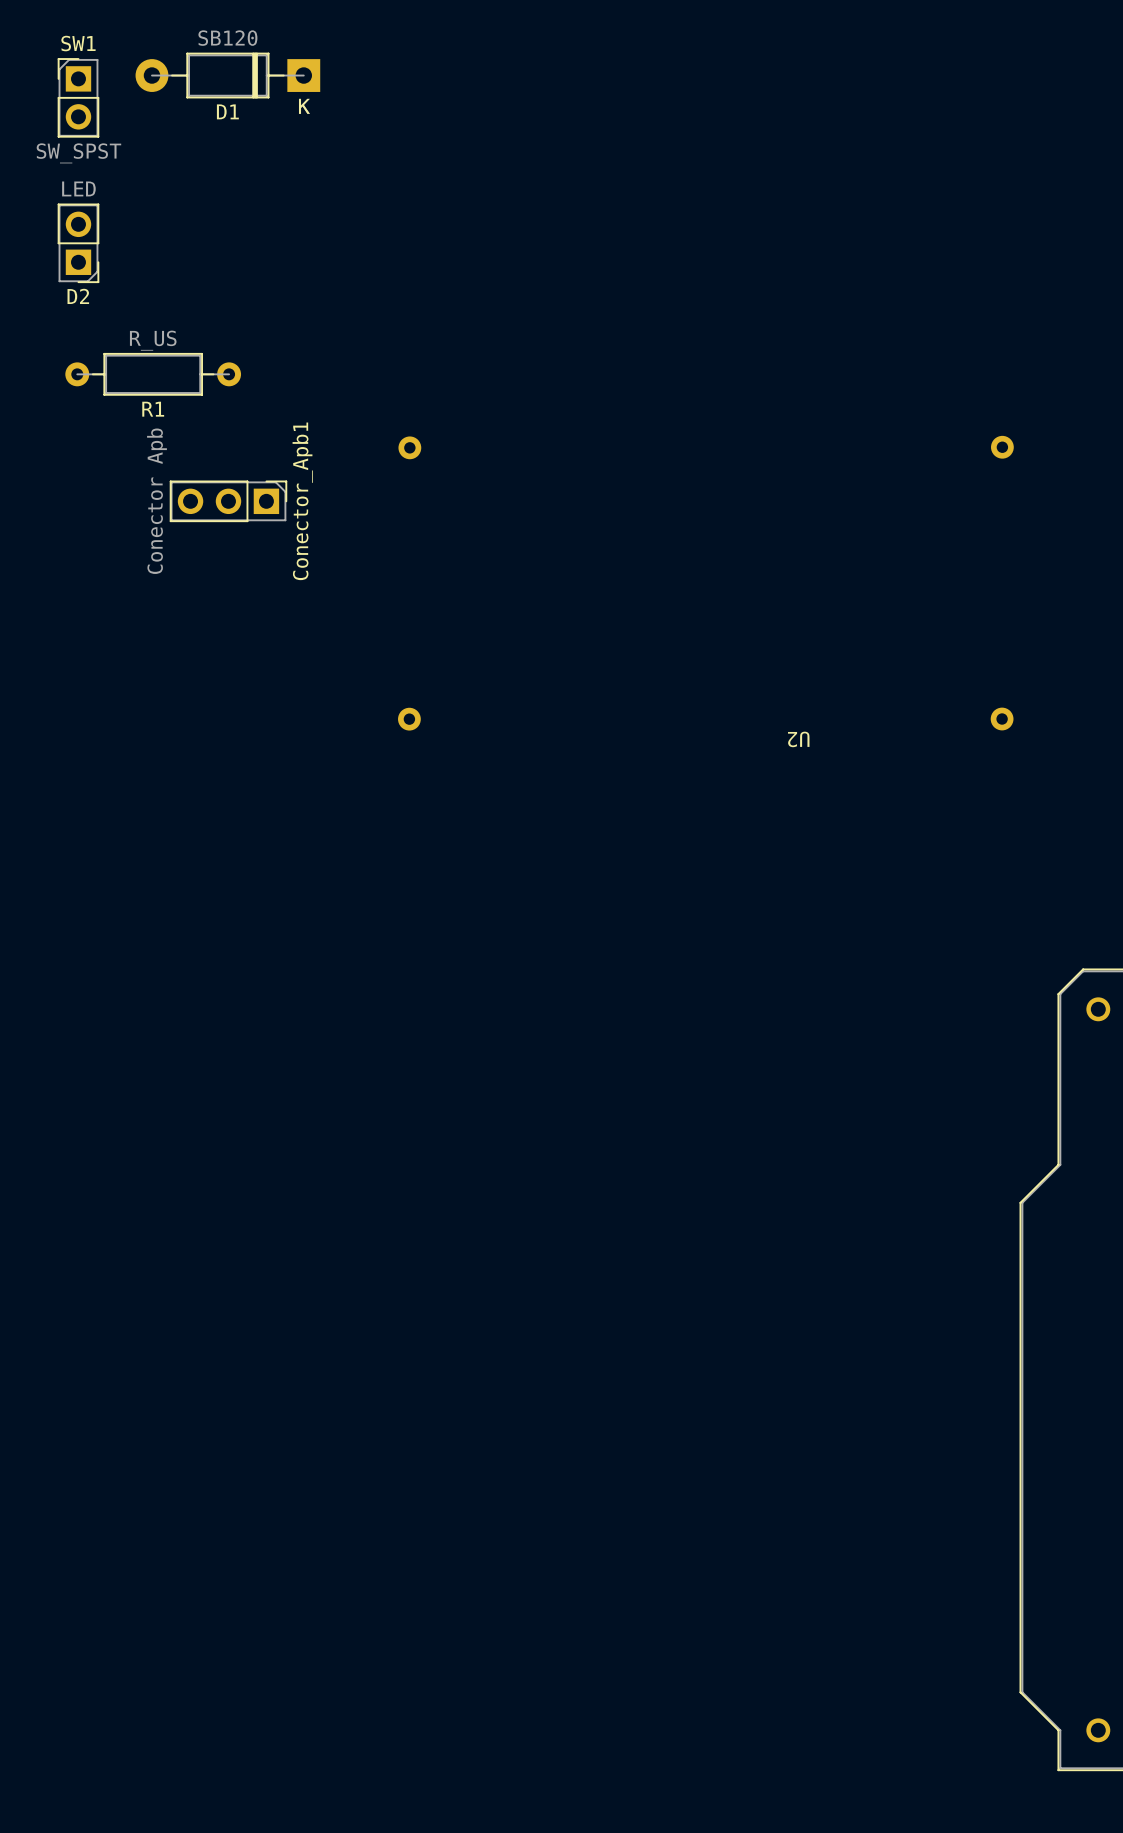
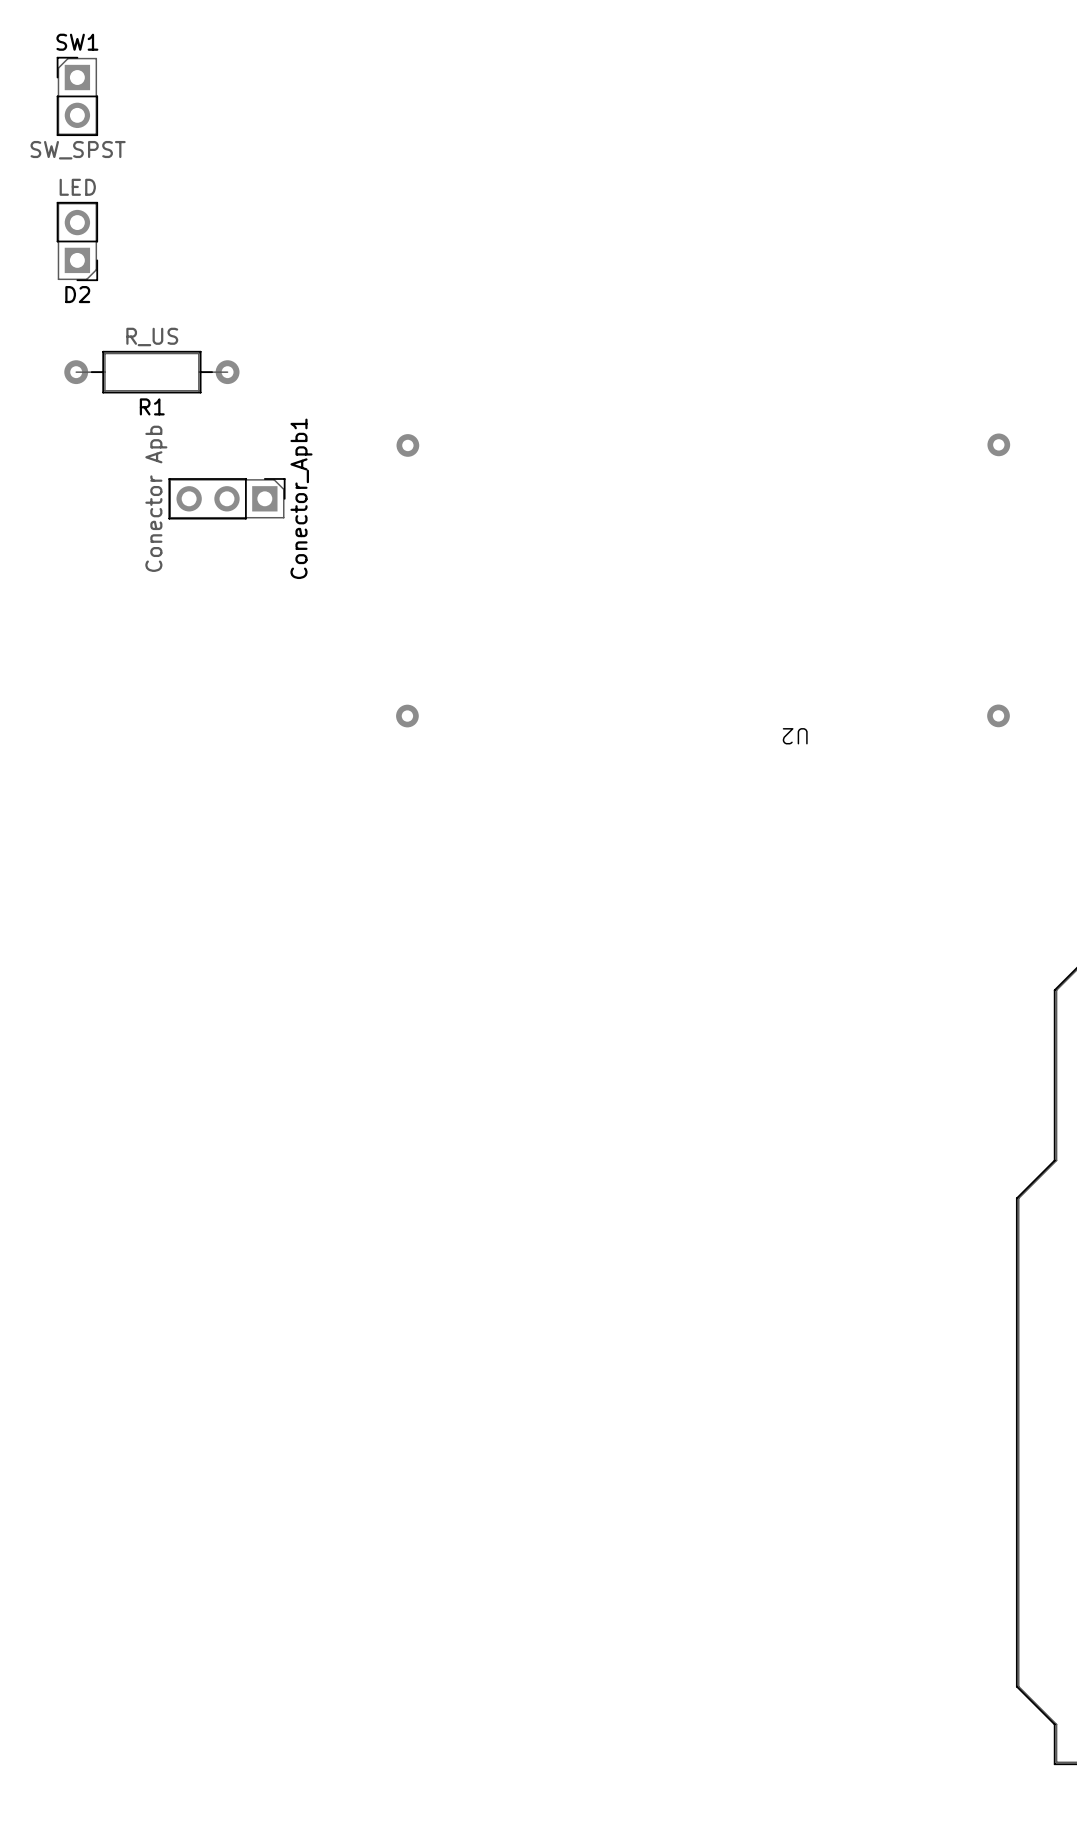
D1: SB120 (227, 75) -> none

